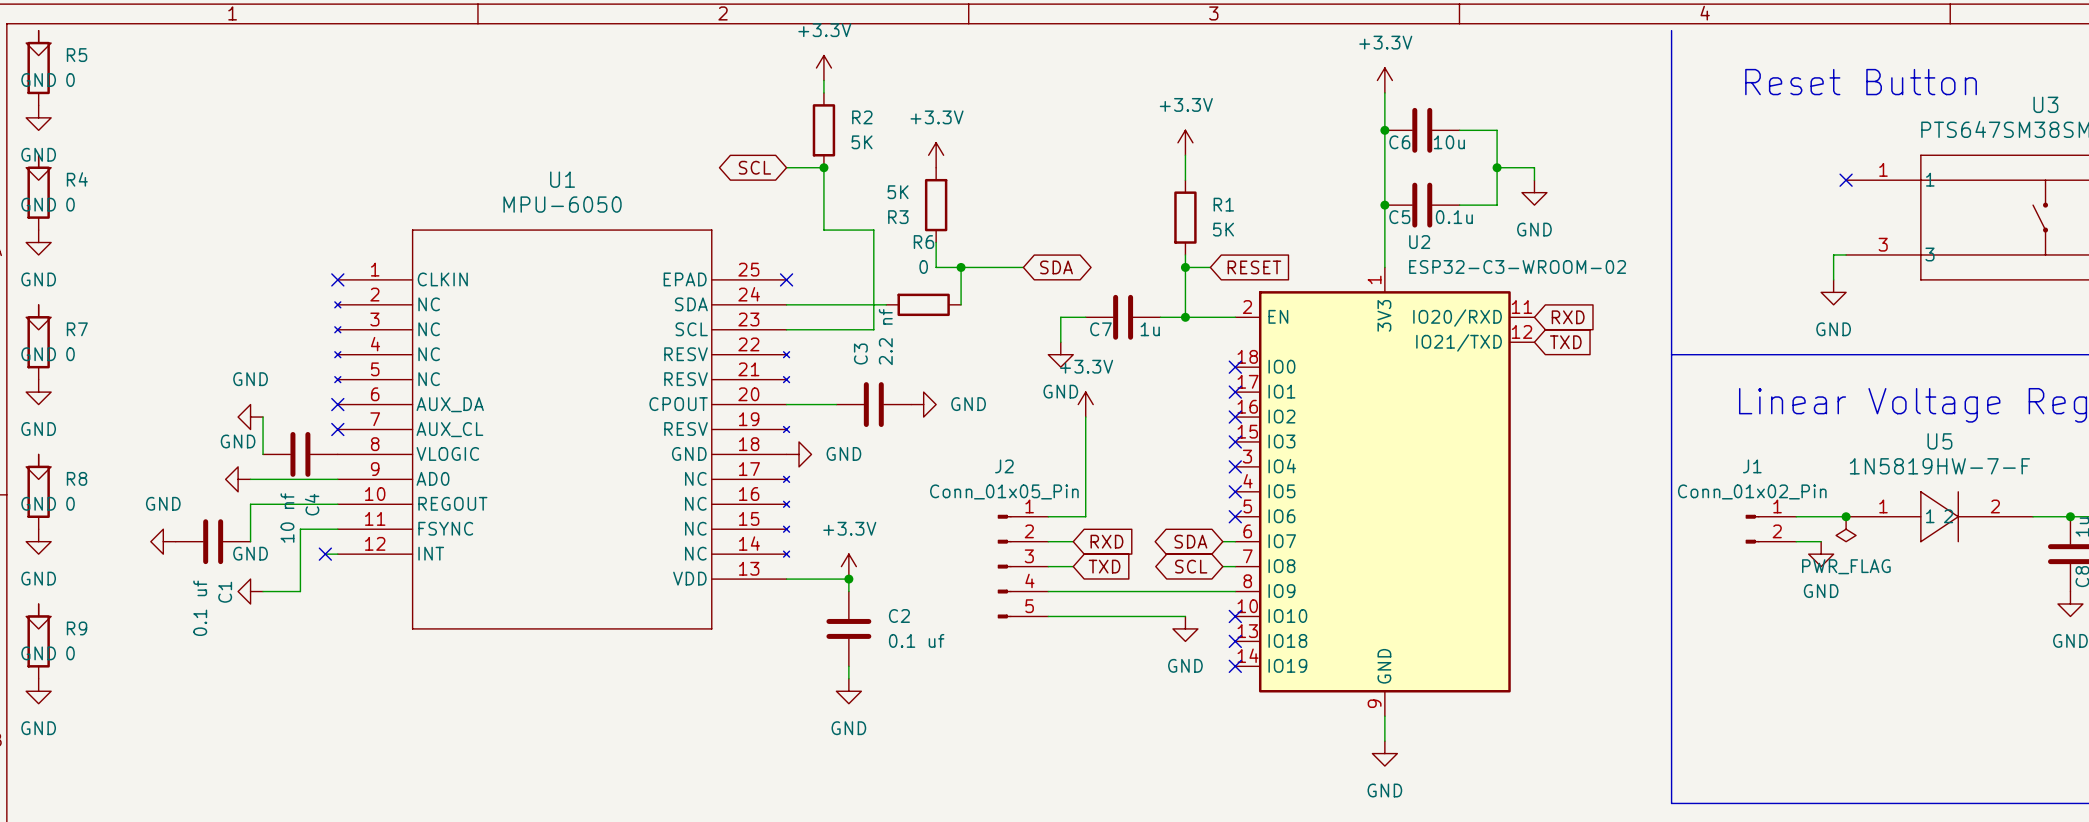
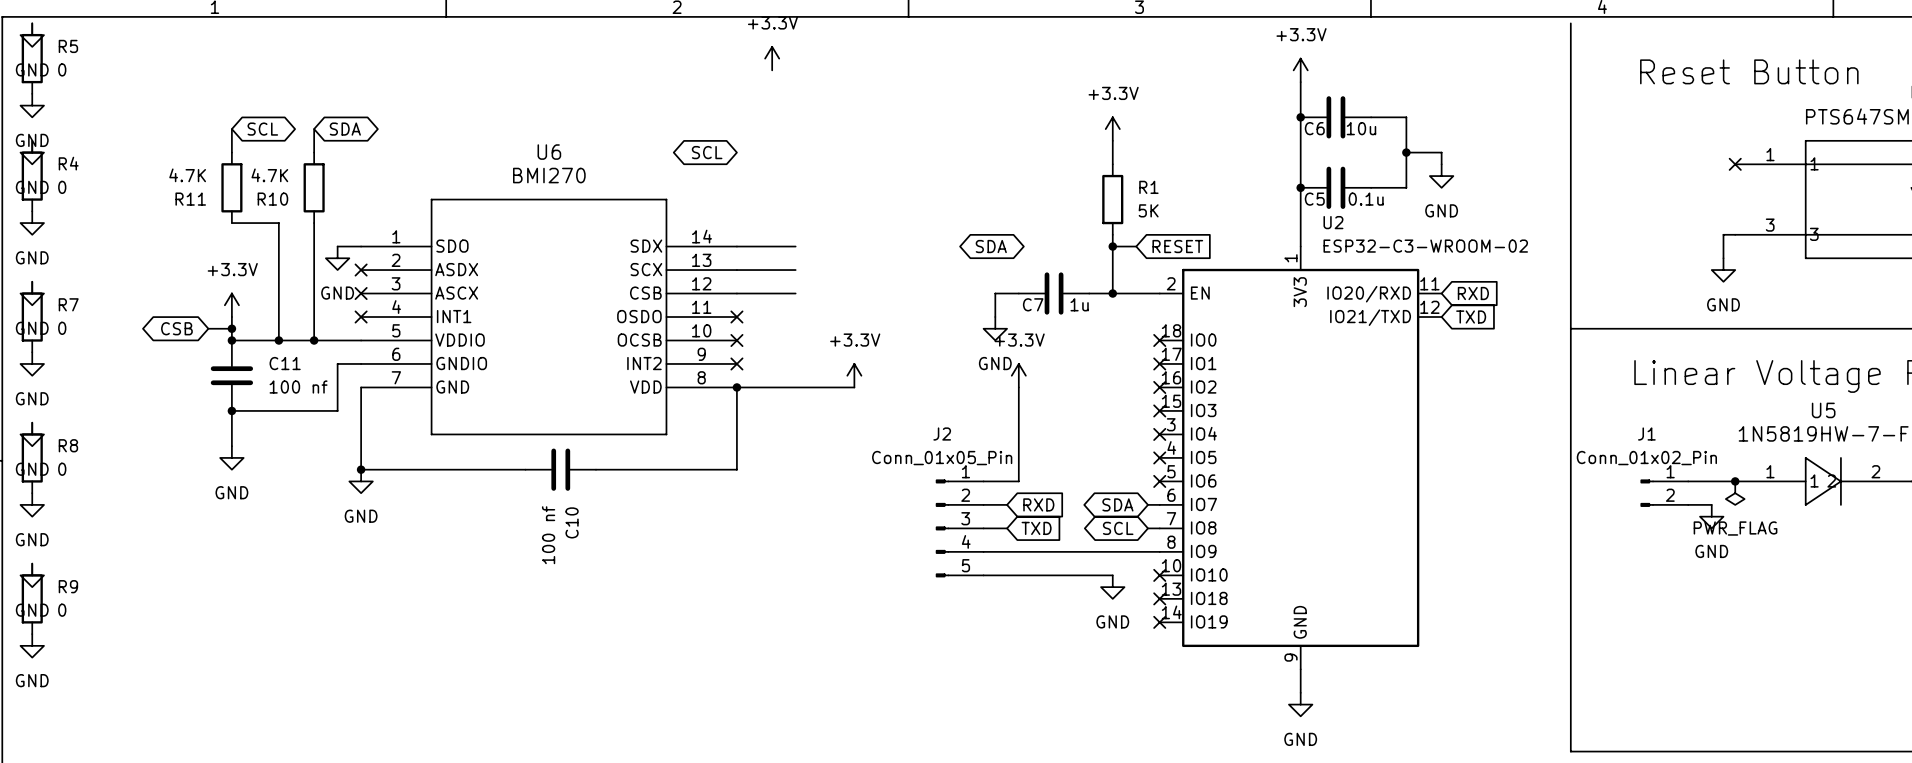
wire: (823, 80) (823, 92) -> none
R2: 5K (823, 130) -> none
wire: none -> (231, 129) (231, 152)
global label: none -> SCL (262, 129)
wire: none -> (314, 129) (314, 152)
global label: none -> SDA (345, 129)
power symbol: +3.3V (936, 155) -> none
wire: (786, 167) (823, 167) (823, 230) (873, 230) (873, 329) (786, 329) -> none
junction: (823, 167) -> none
R11: none -> 4.7K (231, 187)
R10: none -> 4.7K (314, 187)
R3: 5K (936, 205) -> none
wire: none -> (231, 223) (278, 223) (278, 340)
wire: none -> (314, 223) (314, 340)
wire: (936, 242) (936, 267) (1023, 267) -> none
wire: none -> (337, 246) (361, 246)
wire: none -> (736, 246) (795, 246)
wire: (961, 267) (961, 304) -> none
junction: (961, 267) -> none
no-connect mark: (337, 279) -> none
power symbol: none -> GND (337, 258)
no-connect mark: (786, 279) -> none
no-connect mark: none -> (361, 270)
wire: none -> (736, 270) (795, 270)
wire: (786, 304) (886, 304) -> none
R6: 0 (923, 304) -> none
no-connect mark: none -> (361, 293)
wire: none -> (736, 293) (795, 293)
power symbol: none -> +3.3V (231, 305)
wire: none -> (231, 317) (231, 340) (361, 340)
no-connect mark: none -> (361, 317)
U6: none -> BMI270 (549, 317)
no-connect mark: none -> (736, 317)
global label: none -> CSB (176, 328)
wire: none -> (208, 328) (231, 328)
junction: none -> (231, 328)
junction: none -> (231, 340)
junction: none -> (278, 340)
junction: none -> (314, 340)
no-connect mark: none -> (736, 340)
no-connect mark: none -> (736, 363)
C11: none -> 100 nf (231, 375)
no-connect mark: (337, 404) -> none
wire: (786, 404) (836, 404) -> none
C3: 2.2 nf (873, 404) -> none
power symbol: none -> +3.3V (854, 375)
power symbol: GND (923, 404) -> none
power symbol: GND (250, 417) -> none
wire: (263, 417) (263, 454) -> none
wire: none -> (361, 387) (361, 469) (525, 469)
junction: none -> (736, 387)
wire: none -> (854, 387) (736, 387) (736, 469) (596, 469)
no-connect mark: (337, 429) -> none
U1: MPU-6050 (562, 429) -> none
power symbol text position: GND (238, 441) -> GND (231, 492)
junction: none -> (231, 410)
C4: 10 nf (300, 454) -> none
power symbol: GND (799, 454) -> none
power symbol rotation: 0° (238, 479) -> 90° counterclockwise (231, 457)
power symbol position: GND (238, 479) -> GND (231, 457)
wire: (250, 479) (337, 479) -> (231, 446) (231, 410) (337, 410) (337, 363) (361, 363)
wire: (337, 504) (250, 504) (250, 541) -> none
junction: none -> (361, 469)
C10: none -> 100 nf (560, 469)
power symbol: none -> GND (361, 481)
wire: (337, 529) (300, 529) (300, 591) (263, 591) -> none
power symbol: GND (163, 541) -> none
C1: 0.1 uf (213, 541) -> none
wire: (325, 554) (337, 554) -> none
no-connect mark: (325, 554) -> none
power symbol: +3.3V (848, 566) -> none
wire: (786, 579) (848, 579) (848, 591) -> none
junction: (848, 579) -> none
power symbol: GND (250, 591) -> none
C2: 0.1 uf (848, 628) -> none
wire: (848, 666) (848, 678) -> none
power symbol: GND (848, 691) -> none

